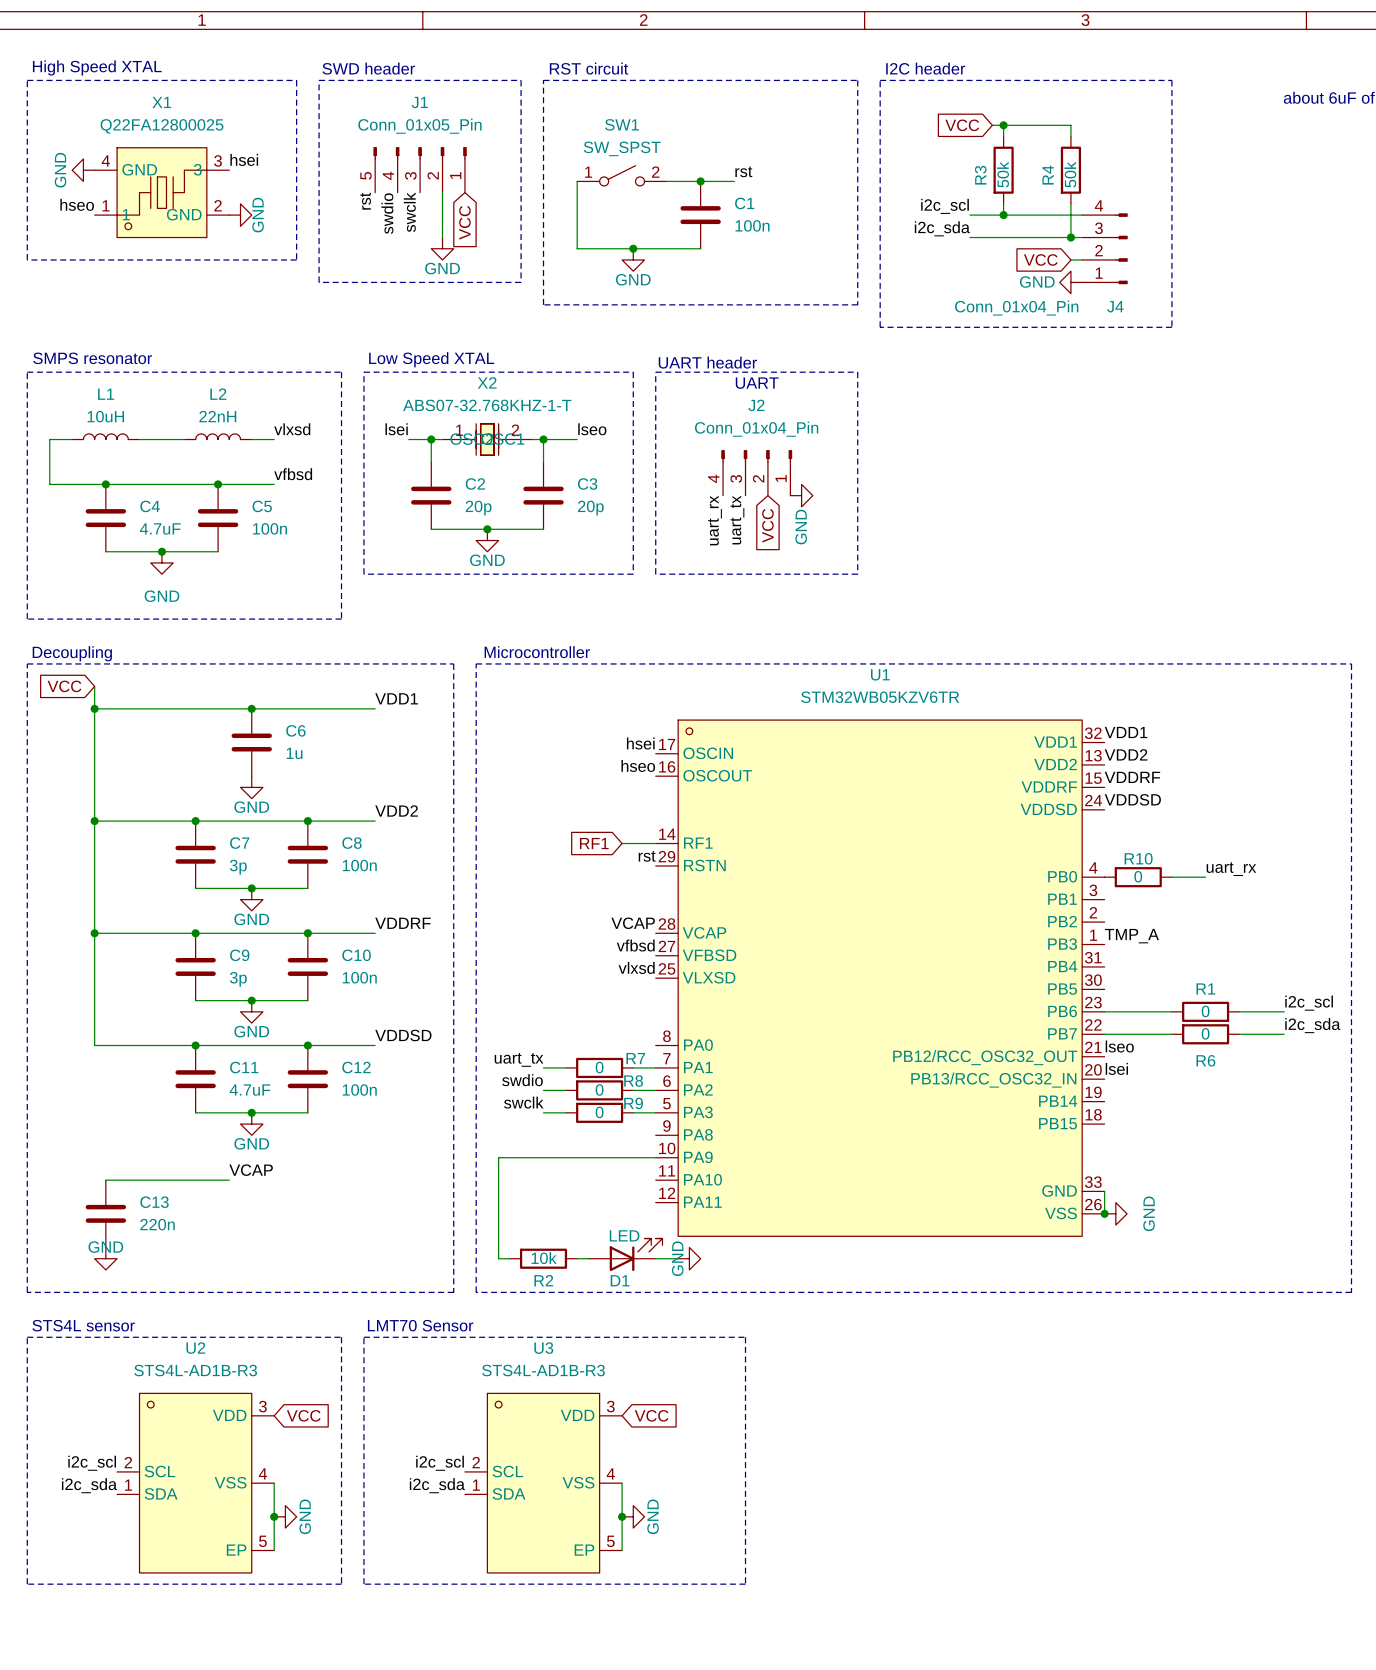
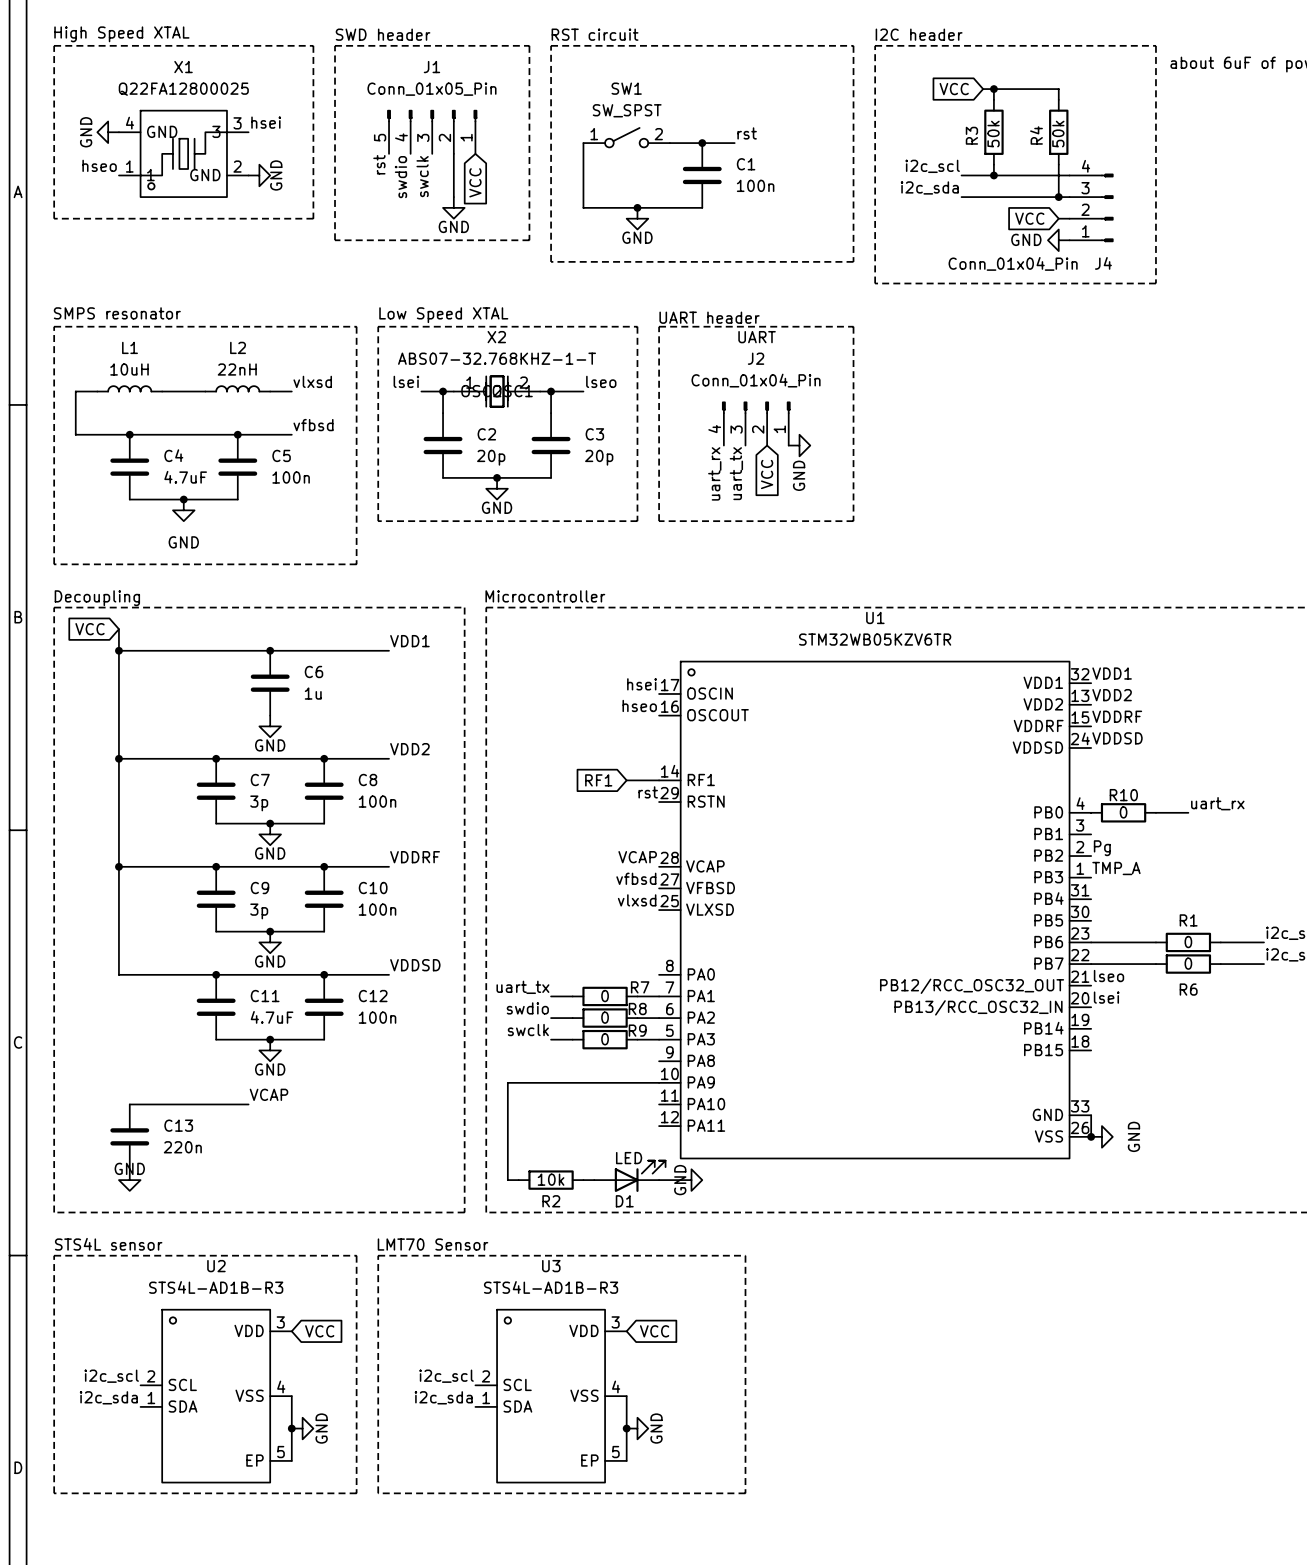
label: none -> Pg (1102, 848)

